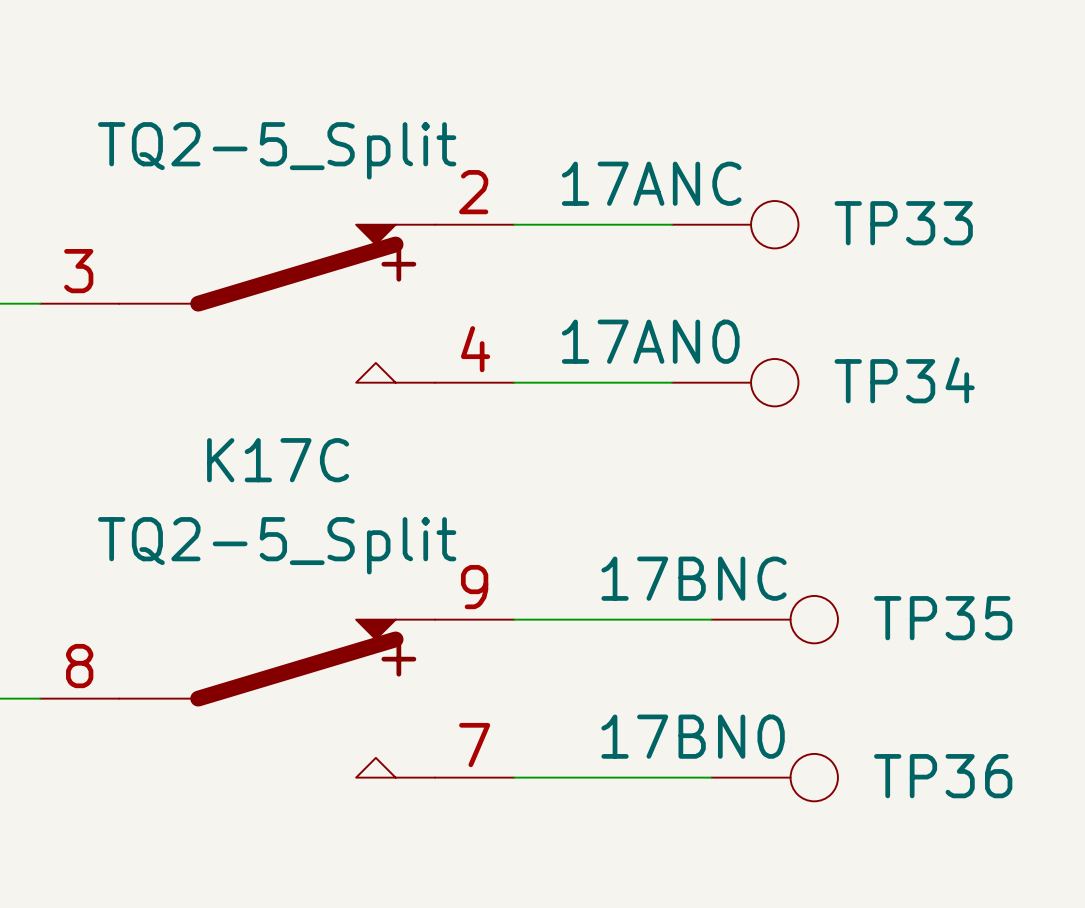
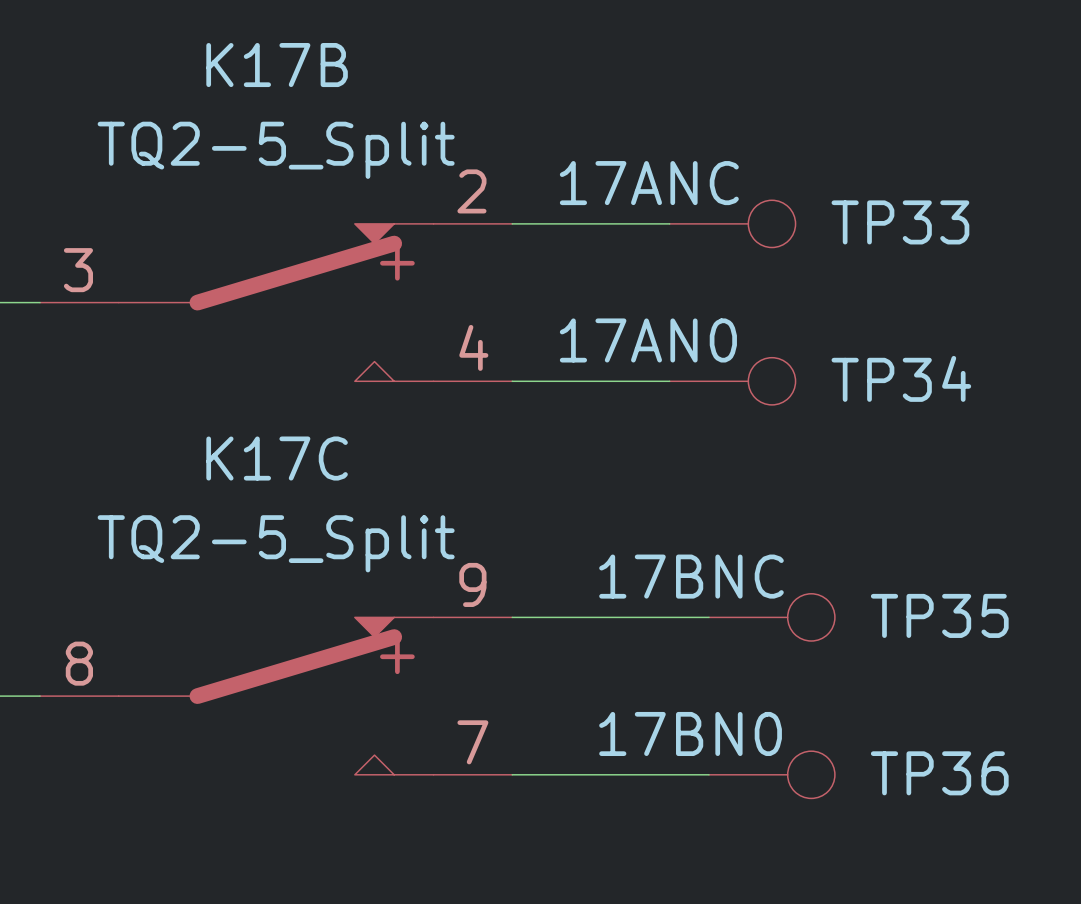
K17B name: none -> K17B (277, 65)

